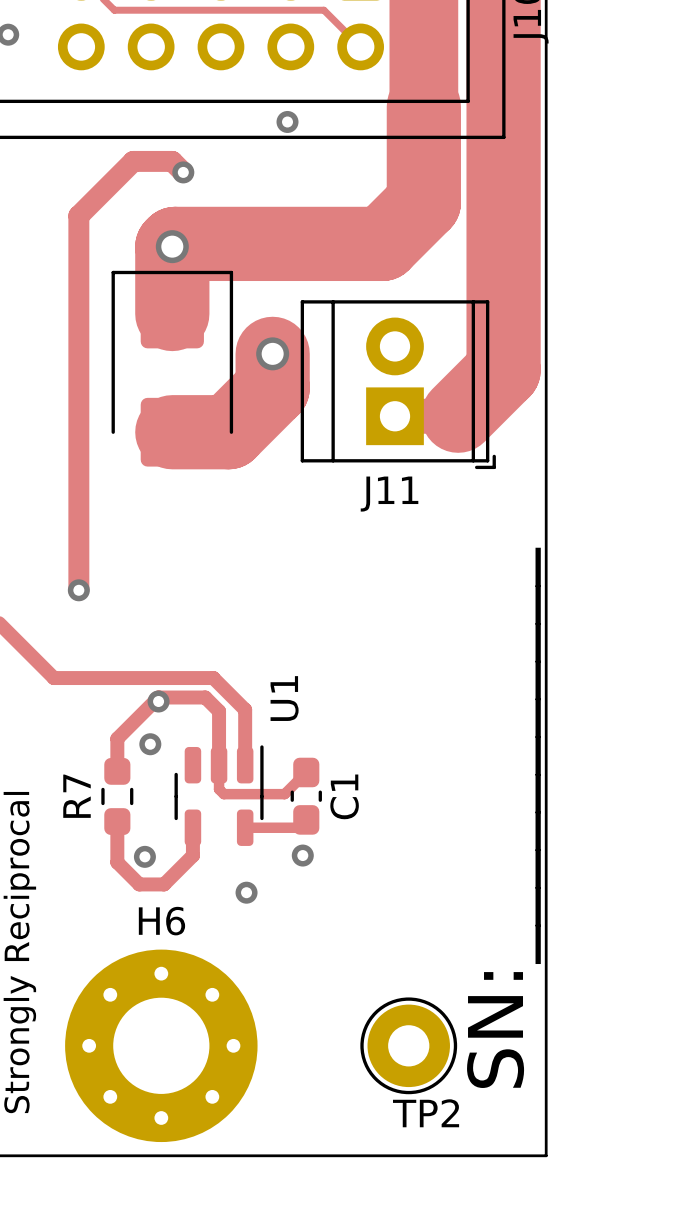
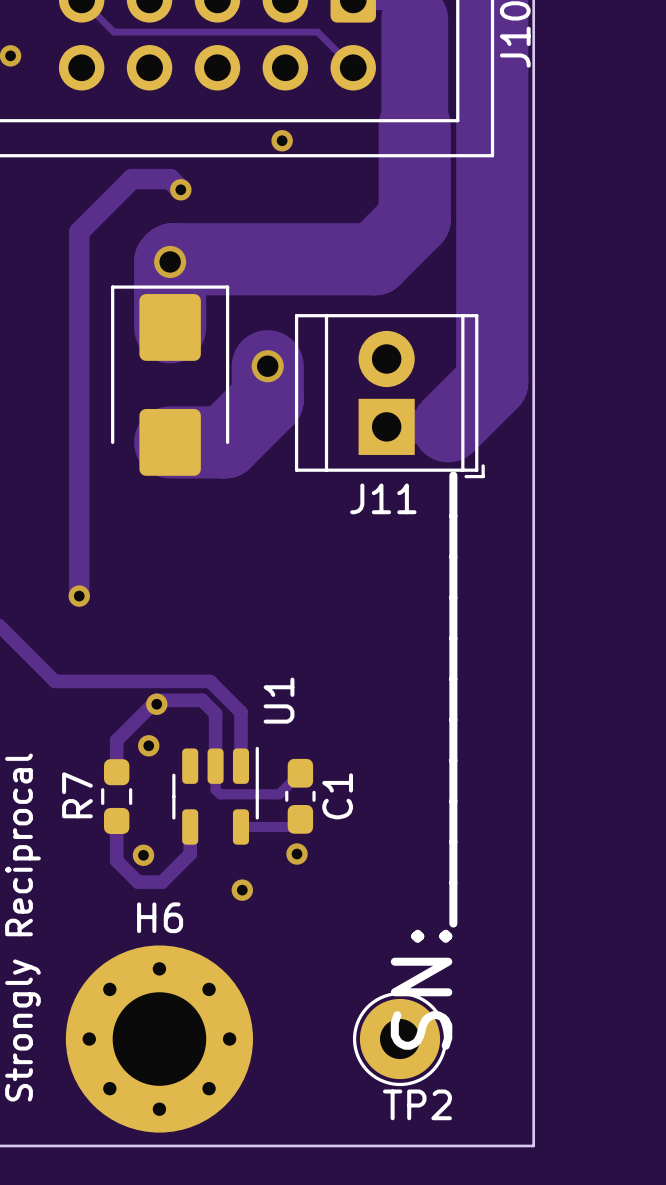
text position: SN:___________ (503, 817) -> SN:___________ (424, 760)

